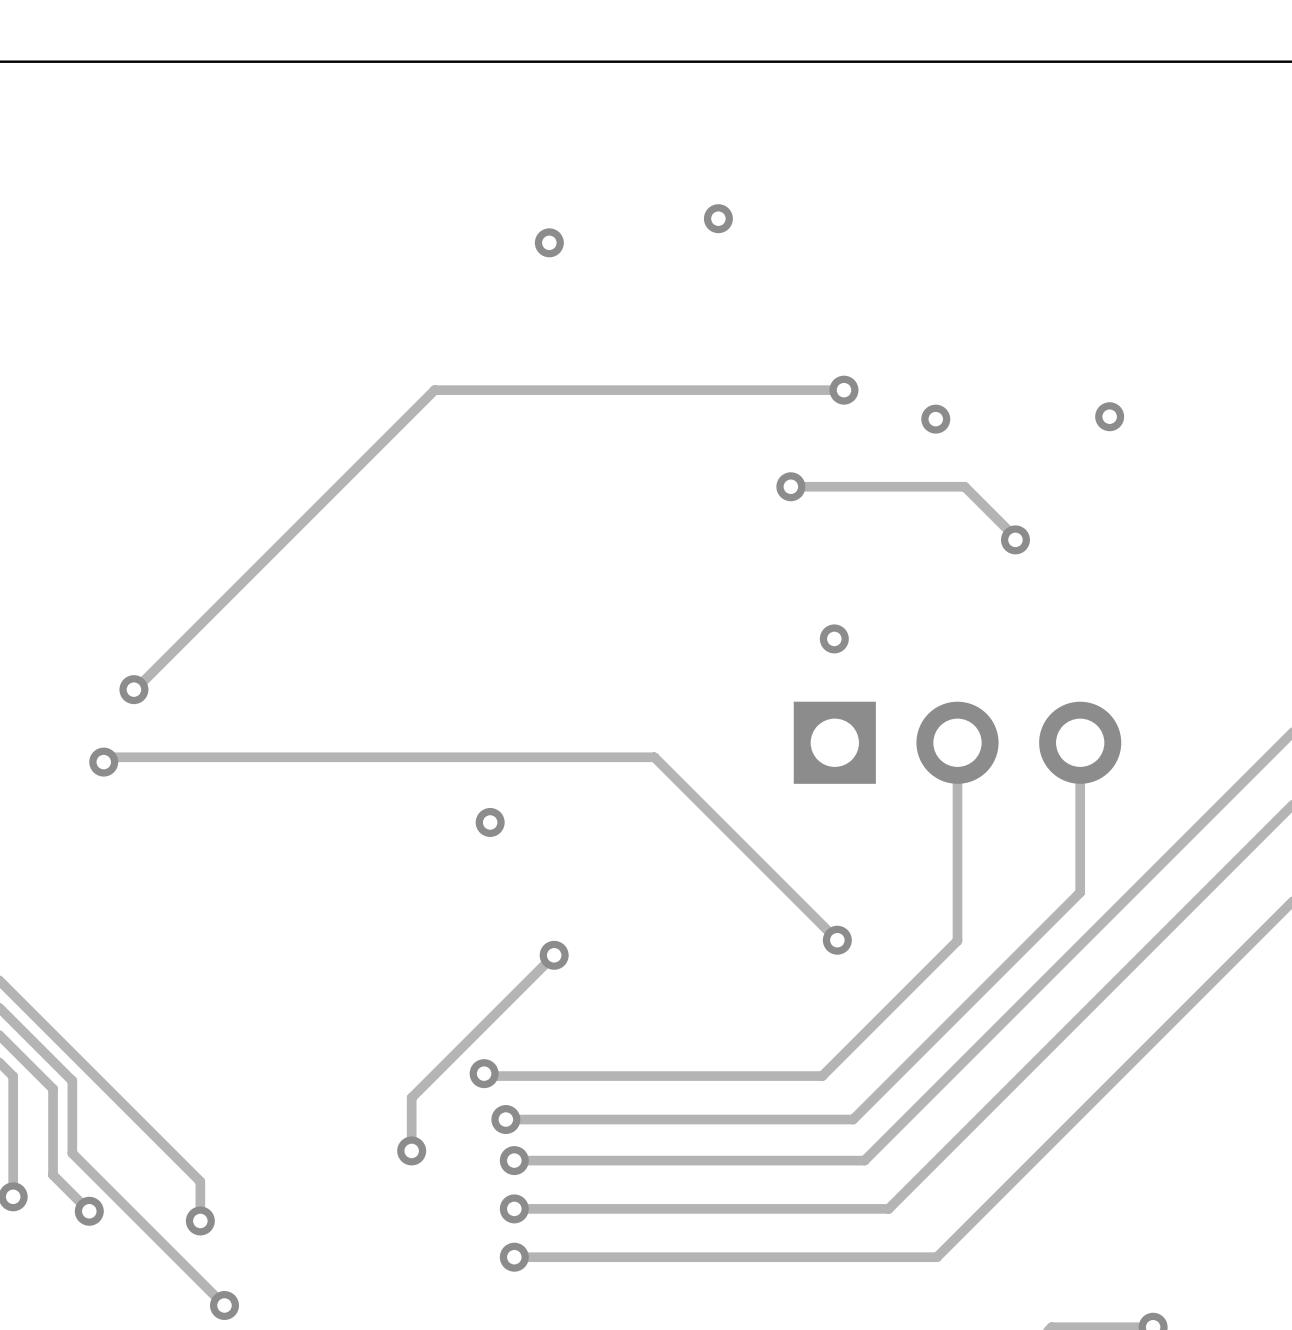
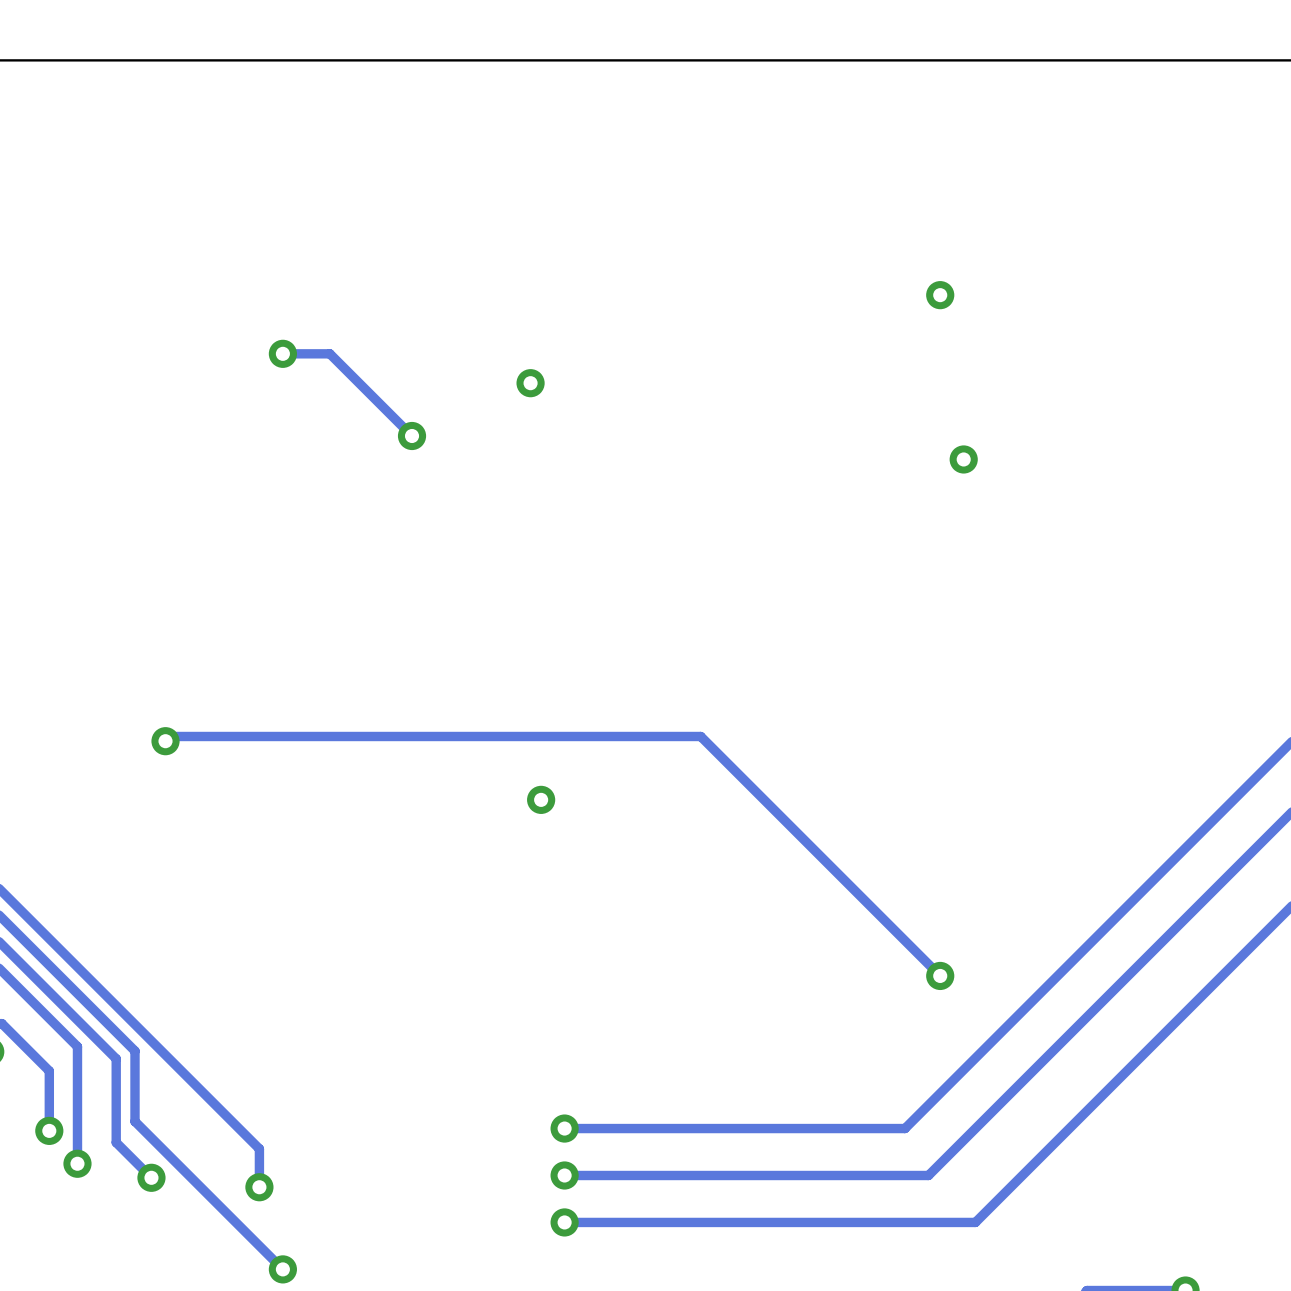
via: (718, 218) -> none
via: (549, 242) -> none
via: none -> (940, 295)
track: none -> (282, 353) (329, 353) (412, 436)
via: none -> (282, 353)
track: (843, 390) (434, 390) (133, 690) (135, 689) -> none
via: (843, 390) -> none
via: none -> (530, 383)
via: (1109, 416) -> none
via position: (935, 419) -> (963, 459)
via: none -> (412, 436)
track: (790, 486) (964, 486) (1015, 537) (1015, 539) (1020, 542) -> none
via: (790, 486) -> none
via: (1015, 539) -> none
via: (834, 638) -> none
via: (133, 689) -> none
track: (957, 742) (957, 940) (822, 1076) (486, 1076) (484, 1073) -> none
part: (957, 742) -> none
track: (1080, 742) (1080, 892) (853, 1119) (505, 1119) -> none
track: none -> (878, 914) (940, 975)
via position: (837, 940) -> (940, 975)
track: (554, 955) (411, 1097) (411, 1153) -> none
via: (554, 955) -> none
via: (484, 1073) -> none
via: (505, 1119) -> none
via: (411, 1150) -> none

